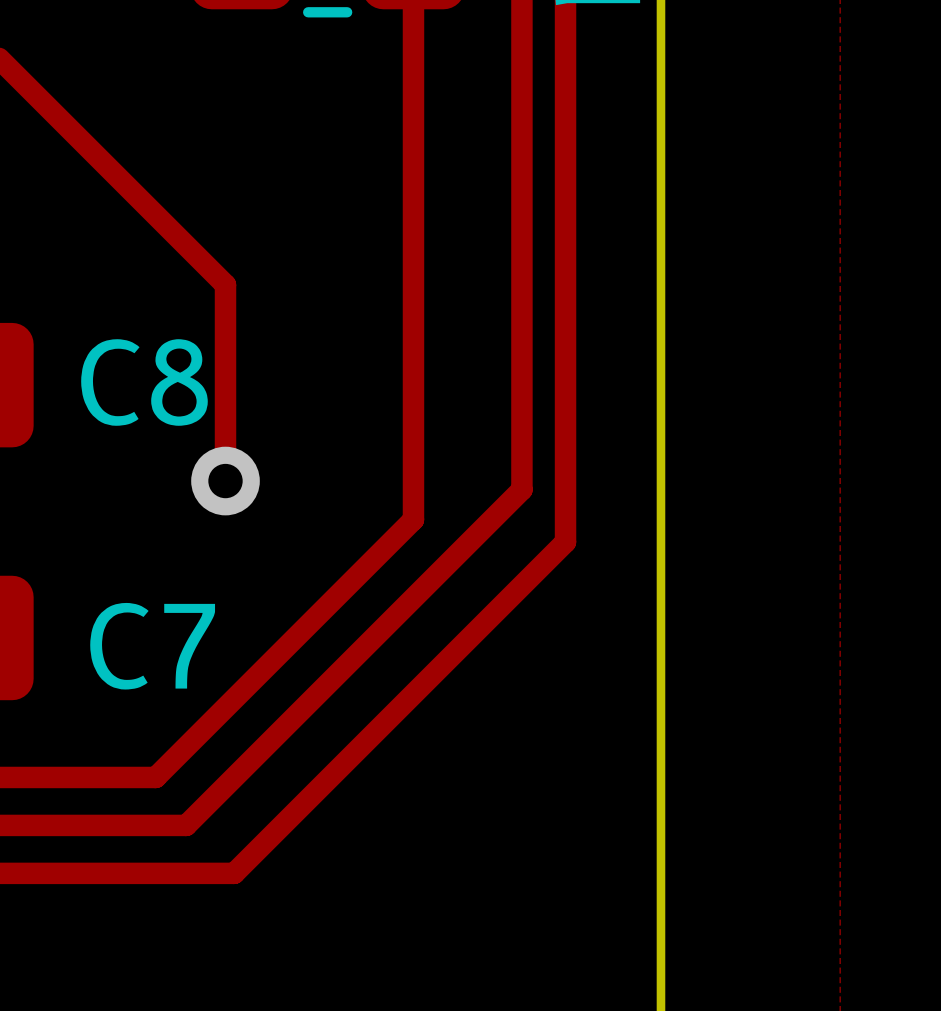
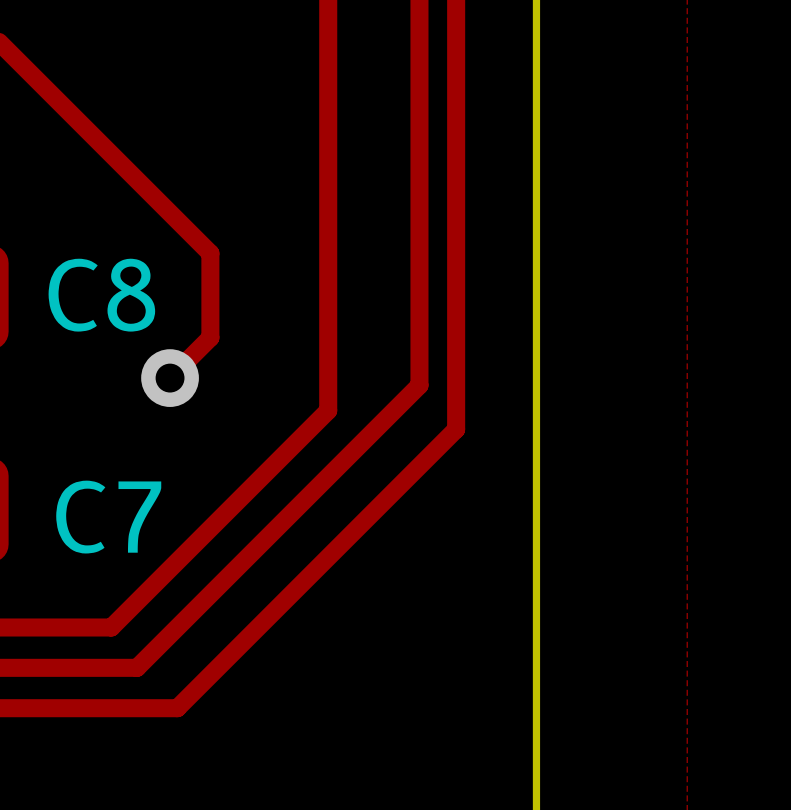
track: (225, 284) (225, 481) -> (170, 213) (210, 253) (210, 337) (170, 378)

